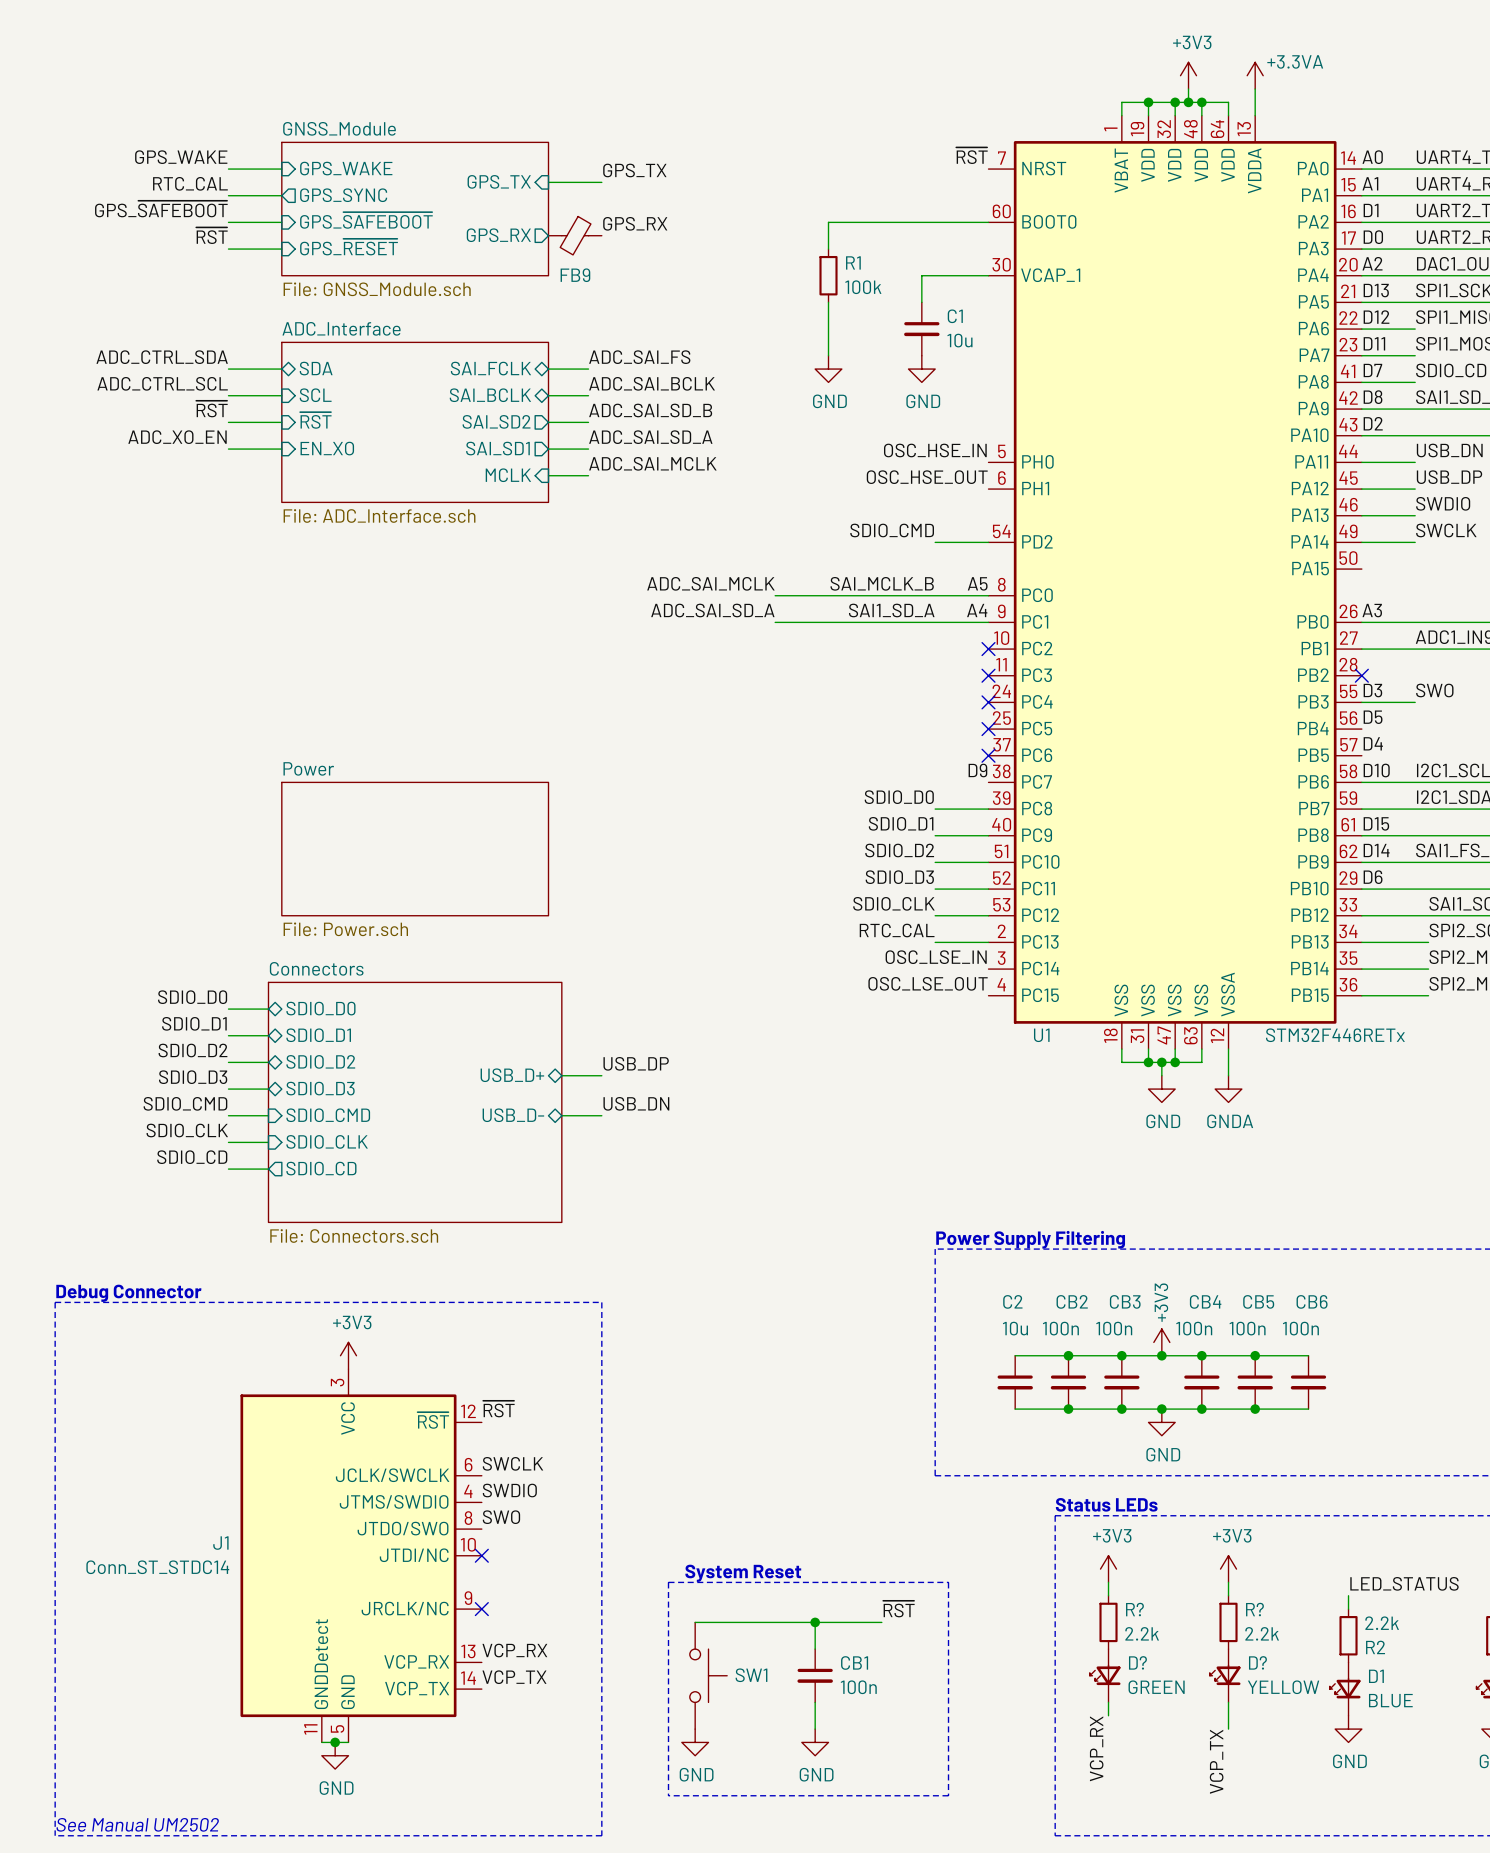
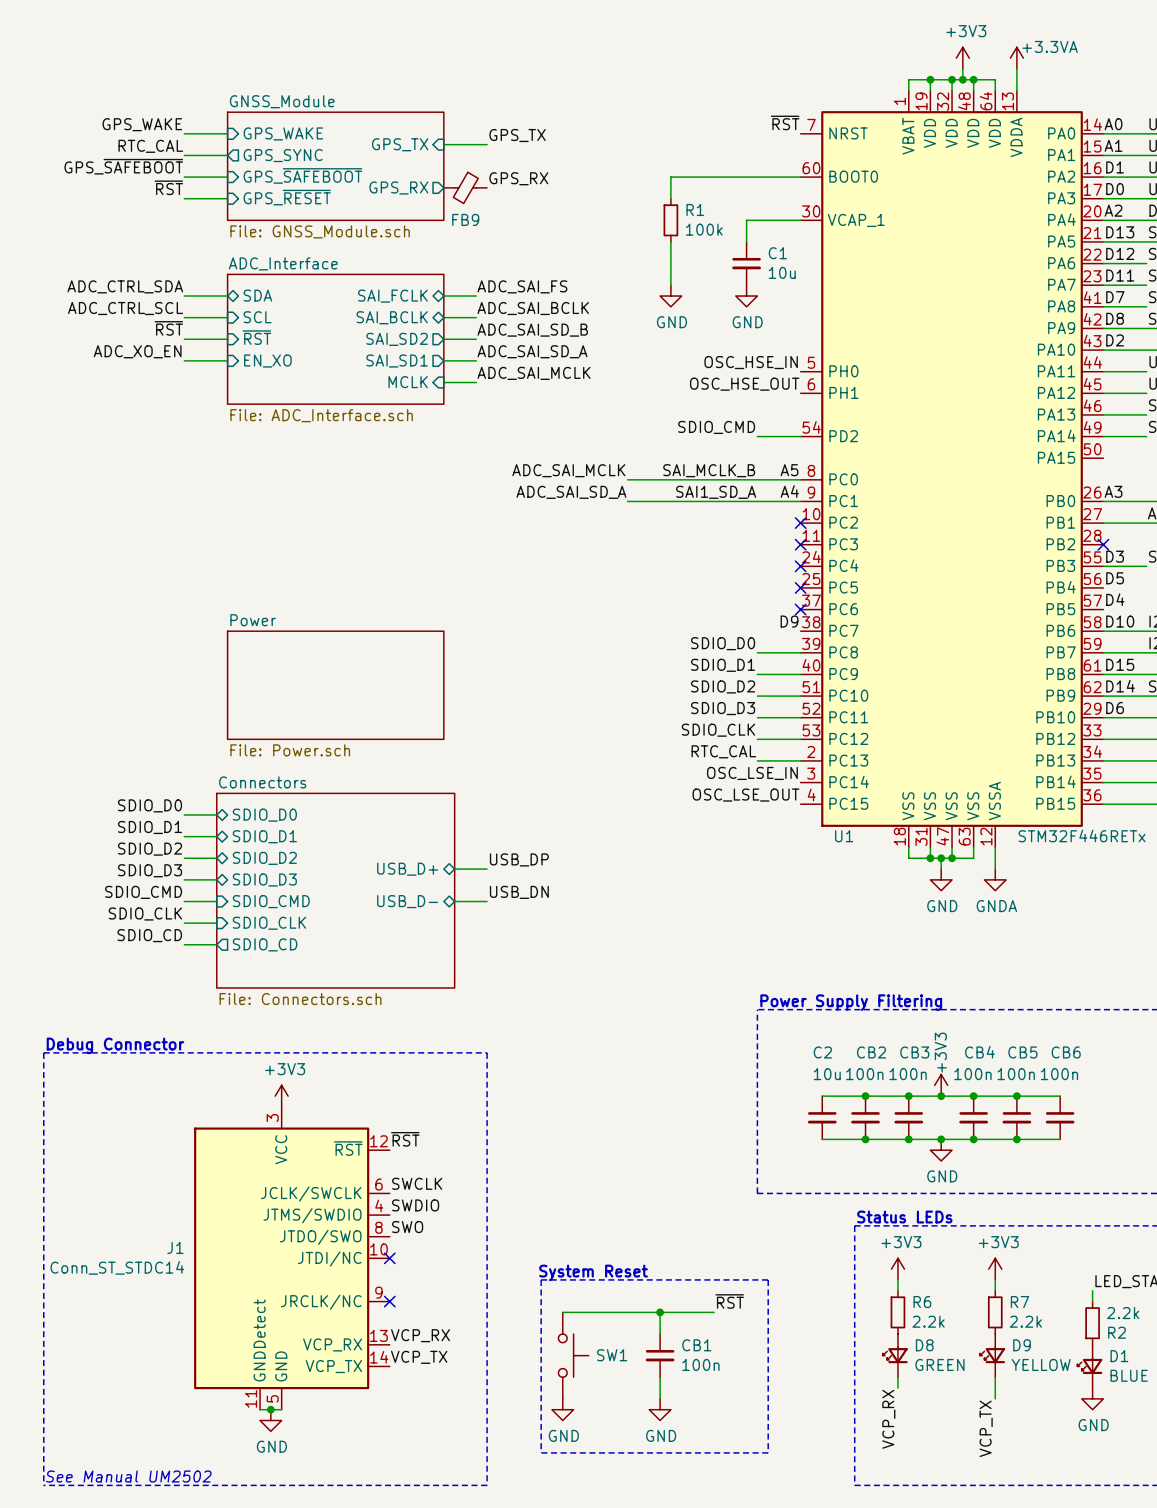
R? name: R? (1134, 1609) -> R6 (922, 1302)
R? name: R? (1254, 1609) -> R7 (1019, 1302)
D? name: D? (1137, 1662) -> D8 (924, 1345)
D? name: D? (1257, 1662) -> D9 (1022, 1345)

